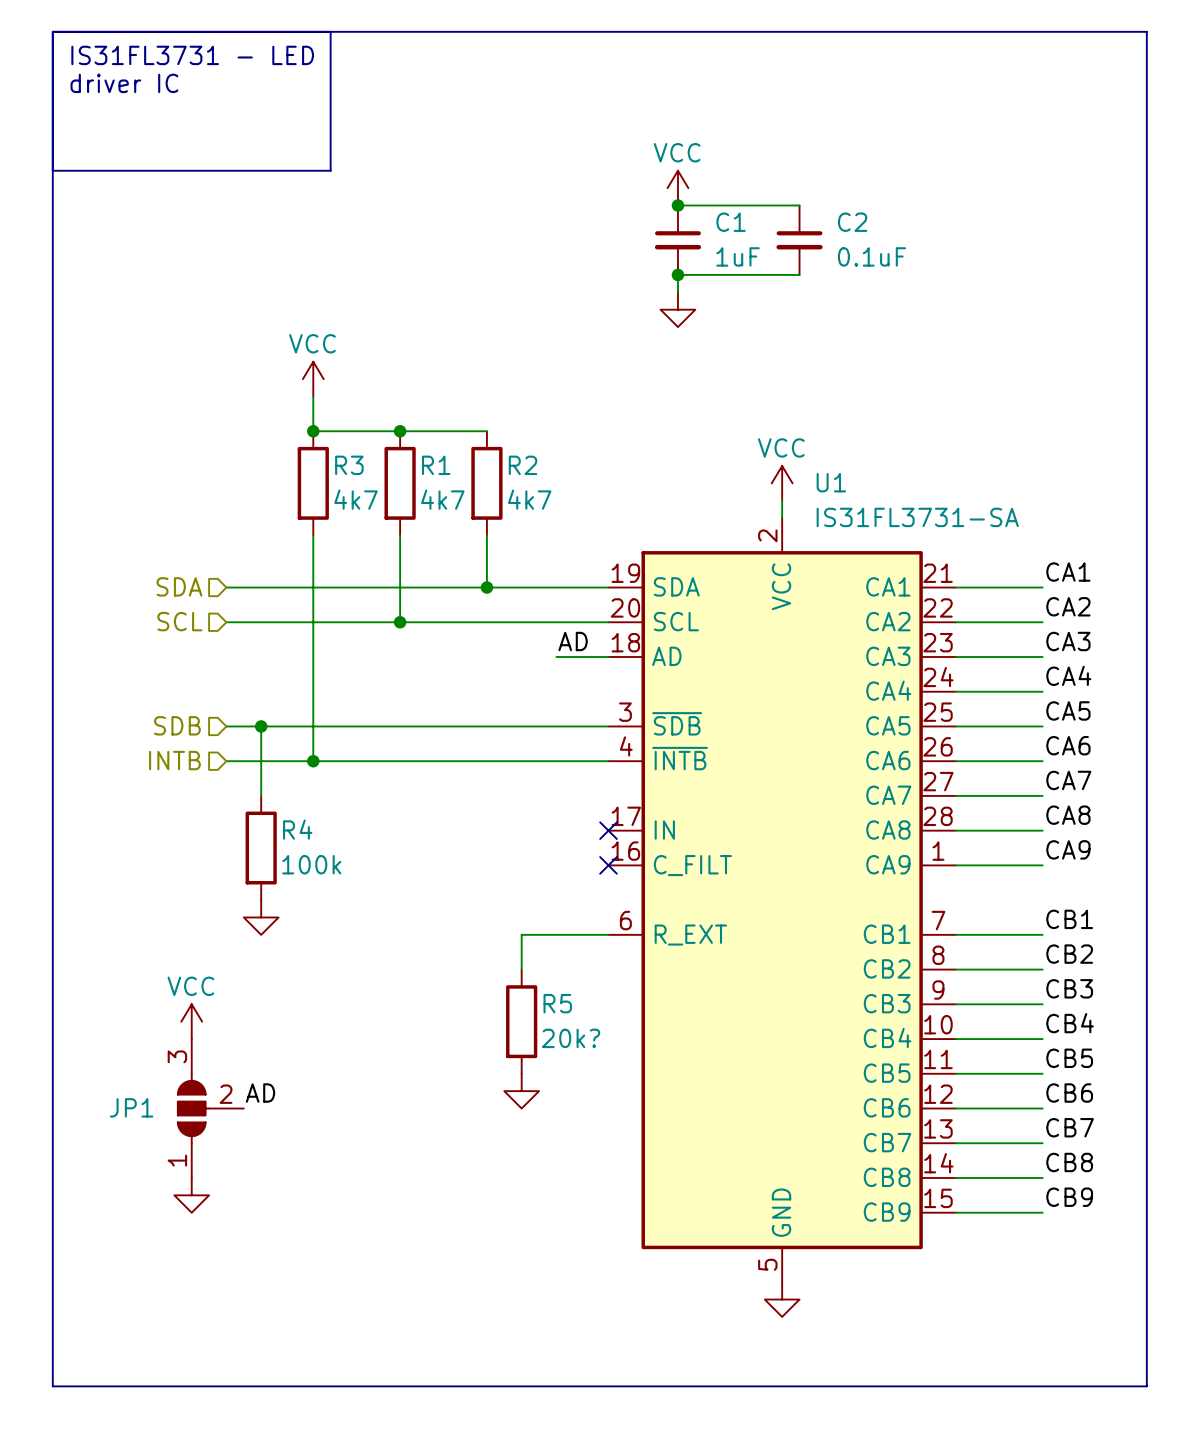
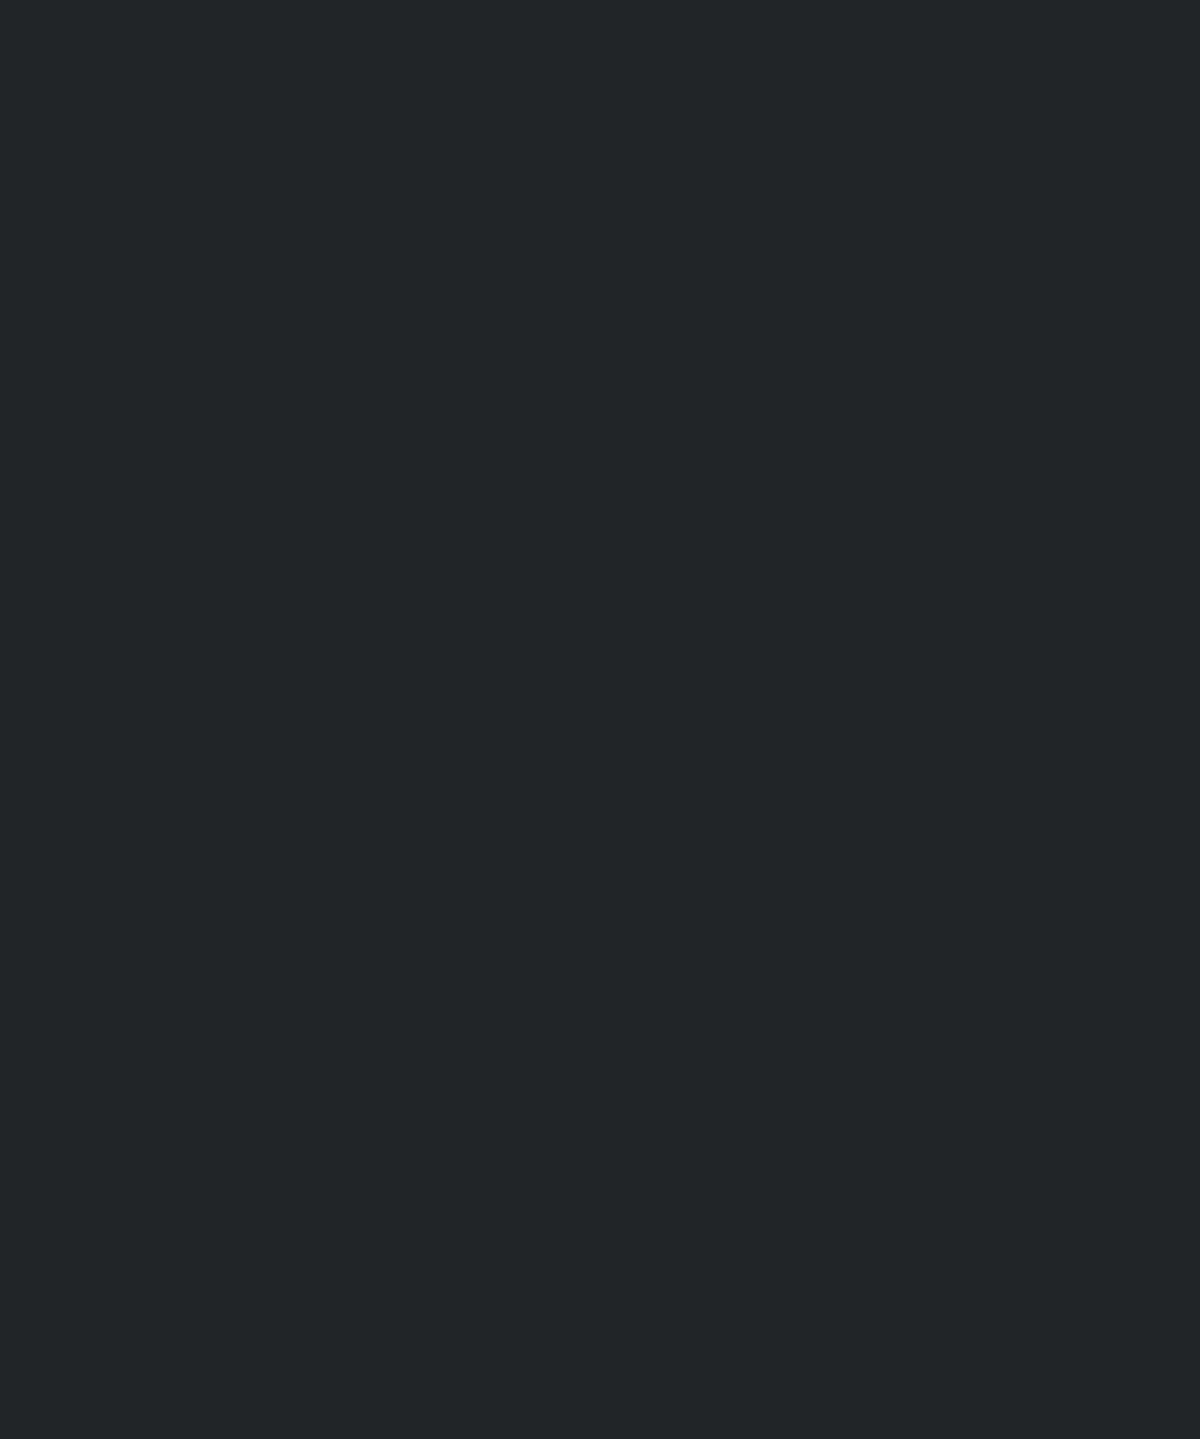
line: (52, 31) (1146, 31) (1146, 1386) (52, 1386) (52, 31) -> none
line: (330, 31) (330, 170) (52, 170) -> none
text: IS31FL3731 - LED (192, 55) -> none
text: driver IC (124, 83) -> none
power symbol: VCC (677, 188) -> none
wire: (677, 205) (799, 205) -> none
junction: (677, 205) -> none
C1: 1uF (677, 240) -> none
C2: 0.1uF (799, 240) -> none
junction: (677, 274) -> none
wire: (799, 274) (677, 274) (677, 292) -> none
power symbol: (677, 309) -> none
power symbol: VCC (313, 379) -> none
wire: (313, 396) (313, 431) (486, 431) -> none
junction: (313, 431) -> none
junction: (400, 431) -> none
R3: 4k7 (313, 483) -> none
R1: 4k7 (400, 483) -> none
R2: 4k7 (486, 483) -> none
power symbol: VCC (782, 483) -> none
wire: (782, 500) (782, 518) -> none
wire: (313, 535) (313, 761) -> none
wire: (400, 535) (400, 622) -> none
wire: (486, 535) (486, 587) -> none
label: CA1 (1068, 572) -> none
hierarchical label: SDA (179, 586) -> none
wire: (226, 587) (608, 587) -> none
junction: (486, 587) -> none
wire: (955, 587) (1042, 587) -> none
label: CA2 (1068, 606) -> none
hierarchical label: SCL (179, 621) -> none
wire: (226, 622) (608, 622) -> none
junction: (400, 622) -> none
wire: (955, 622) (1042, 622) -> none
label: AD (573, 641) -> none
label: CA3 (1068, 641) -> none
wire: (556, 657) (608, 657) -> none
wire: (955, 657) (1042, 657) -> none
label: CA4 (1068, 675) -> none
wire: (955, 691) (1042, 691) -> none
label: CA5 (1068, 710) -> none
hierarchical label: SDB (177, 725) -> none
wire: (226, 726) (608, 726) -> none
wire: (261, 726) (261, 795) -> none
junction: (261, 726) -> none
wire: (955, 726) (1042, 726) -> none
label: CA6 (1068, 745) -> none
hierarchical label: INTB (174, 760) -> none
wire: (226, 761) (608, 761) -> none
junction: (313, 761) -> none
wire: (955, 761) (1042, 761) -> none
label: CA7 (1068, 780) -> none
wire: (955, 795) (1042, 795) -> none
label: CA8 (1068, 815) -> none
no-connect mark: (608, 830) -> none
wire: (955, 830) (1042, 830) -> none
R4: 100k (261, 848) -> none
label: CA9 (1068, 849) -> none
no-connect mark: (608, 865) -> none
wire: (955, 865) (1042, 865) -> none
U1: IS31FL3731-SA (782, 900) -> none
power symbol: (261, 917) -> none
label: CB1 (1069, 919) -> none
wire: (608, 934) (521, 934) (521, 969) -> none
wire: (955, 934) (1042, 934) -> none
label: CB2 (1069, 954) -> none
wire: (955, 969) (1042, 969) -> none
label: CB3 (1069, 988) -> none
wire: (955, 1004) (1042, 1004) -> none
power symbol: VCC (191, 1021) -> none
R5: 20k? (521, 1021) -> none
label: CB4 (1070, 1023) -> none
wire: (955, 1039) (1042, 1039) -> none
label: CB5 (1069, 1058) -> none
wire: (955, 1073) (1042, 1073) -> none
power symbol: (521, 1091) -> none
label: AD (260, 1093) -> none
label: CB6 (1069, 1093) -> none
JP1: (210, 1108) -> none
wire: (955, 1108) (1042, 1108) -> none
label: CB7 (1070, 1127) -> none
wire: (955, 1143) (1042, 1143) -> none
label: CB8 (1069, 1162) -> none
wire: (955, 1177) (1042, 1177) -> none
power symbol: (191, 1195) -> none
label: CB9 (1069, 1197) -> none
wire: (955, 1212) (1042, 1212) -> none
power symbol: (782, 1299) -> none

